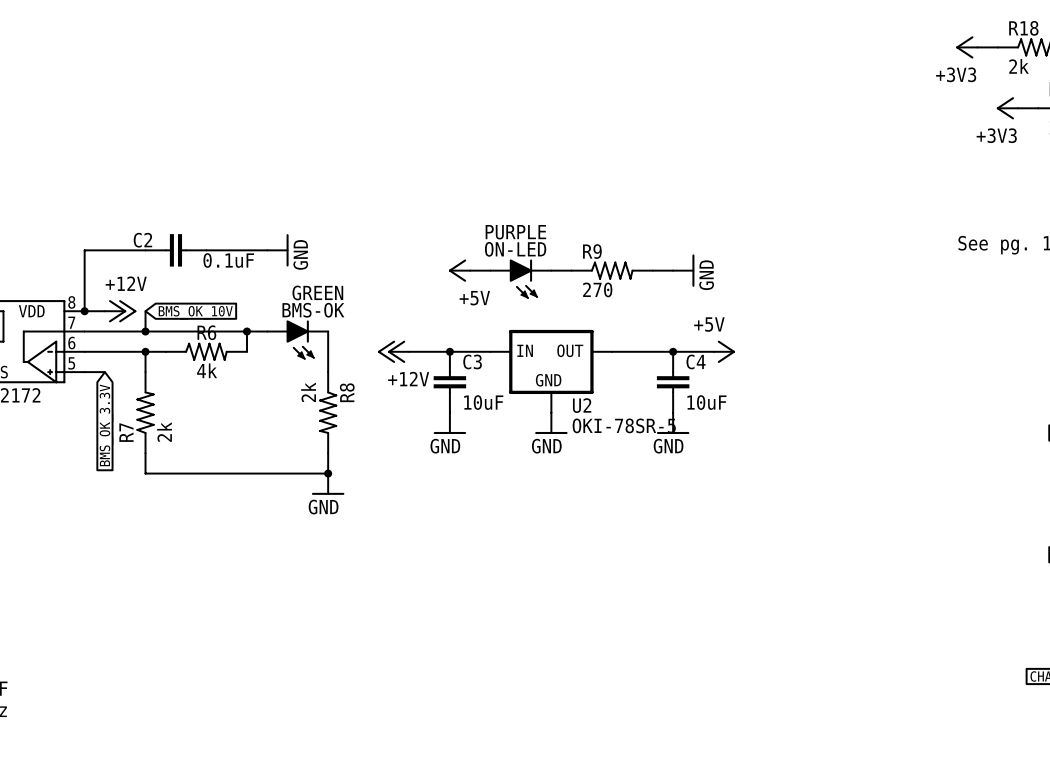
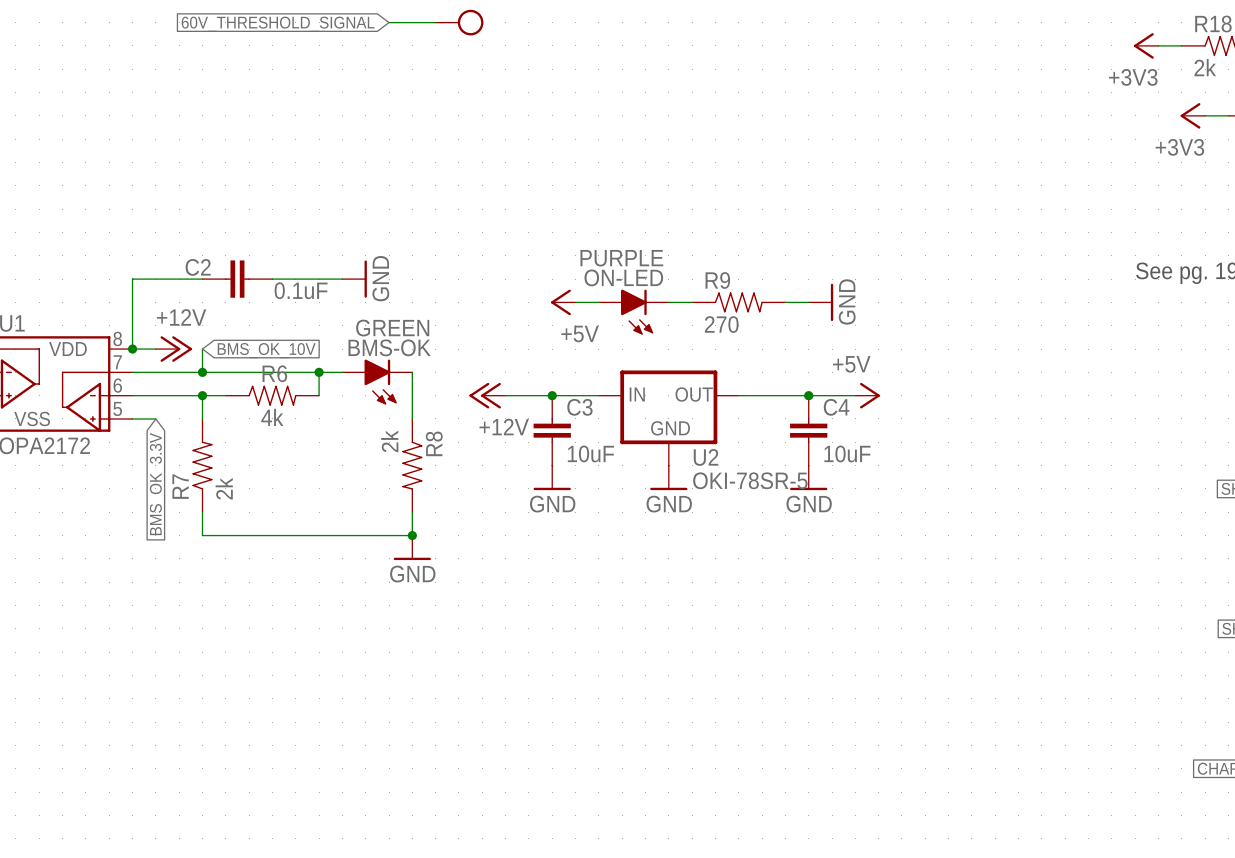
wire: none -> (389, 22) (435, 22)
part: none -> (459, 22)
global label: none -> 60V_THRESHOLD_SIGNAL (278, 24)

